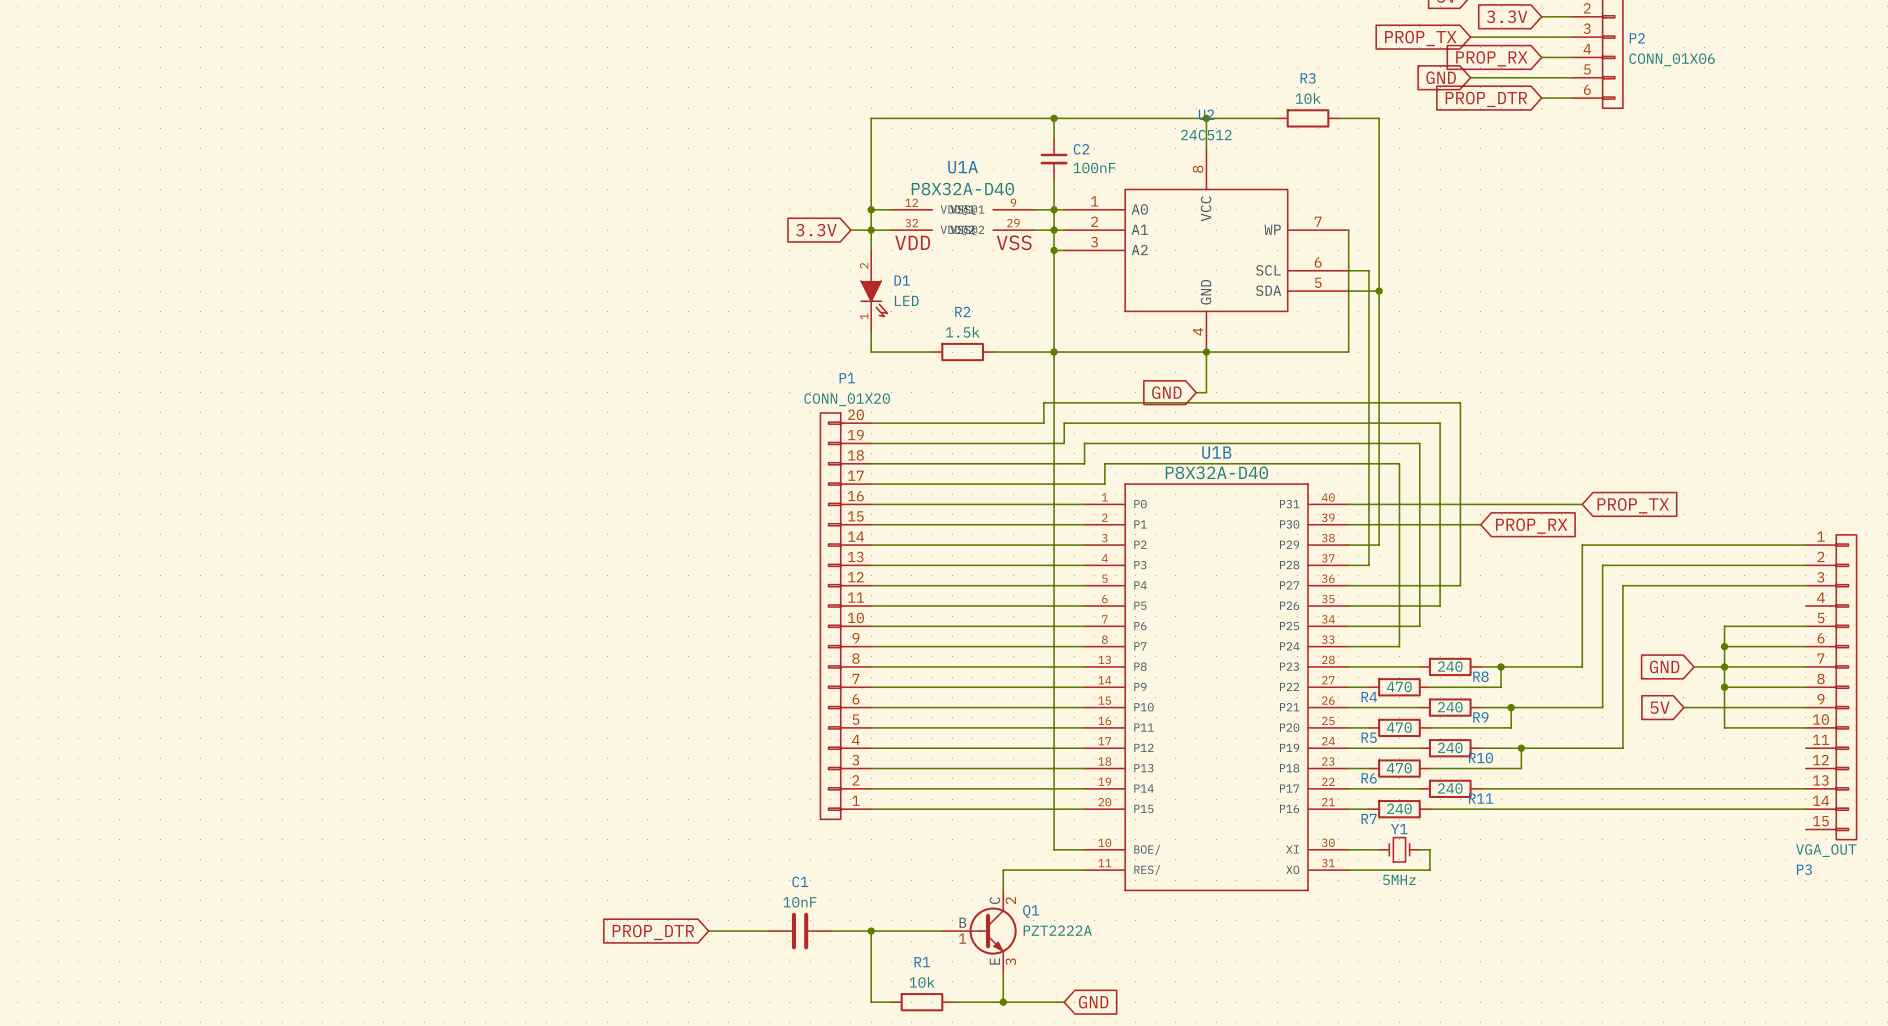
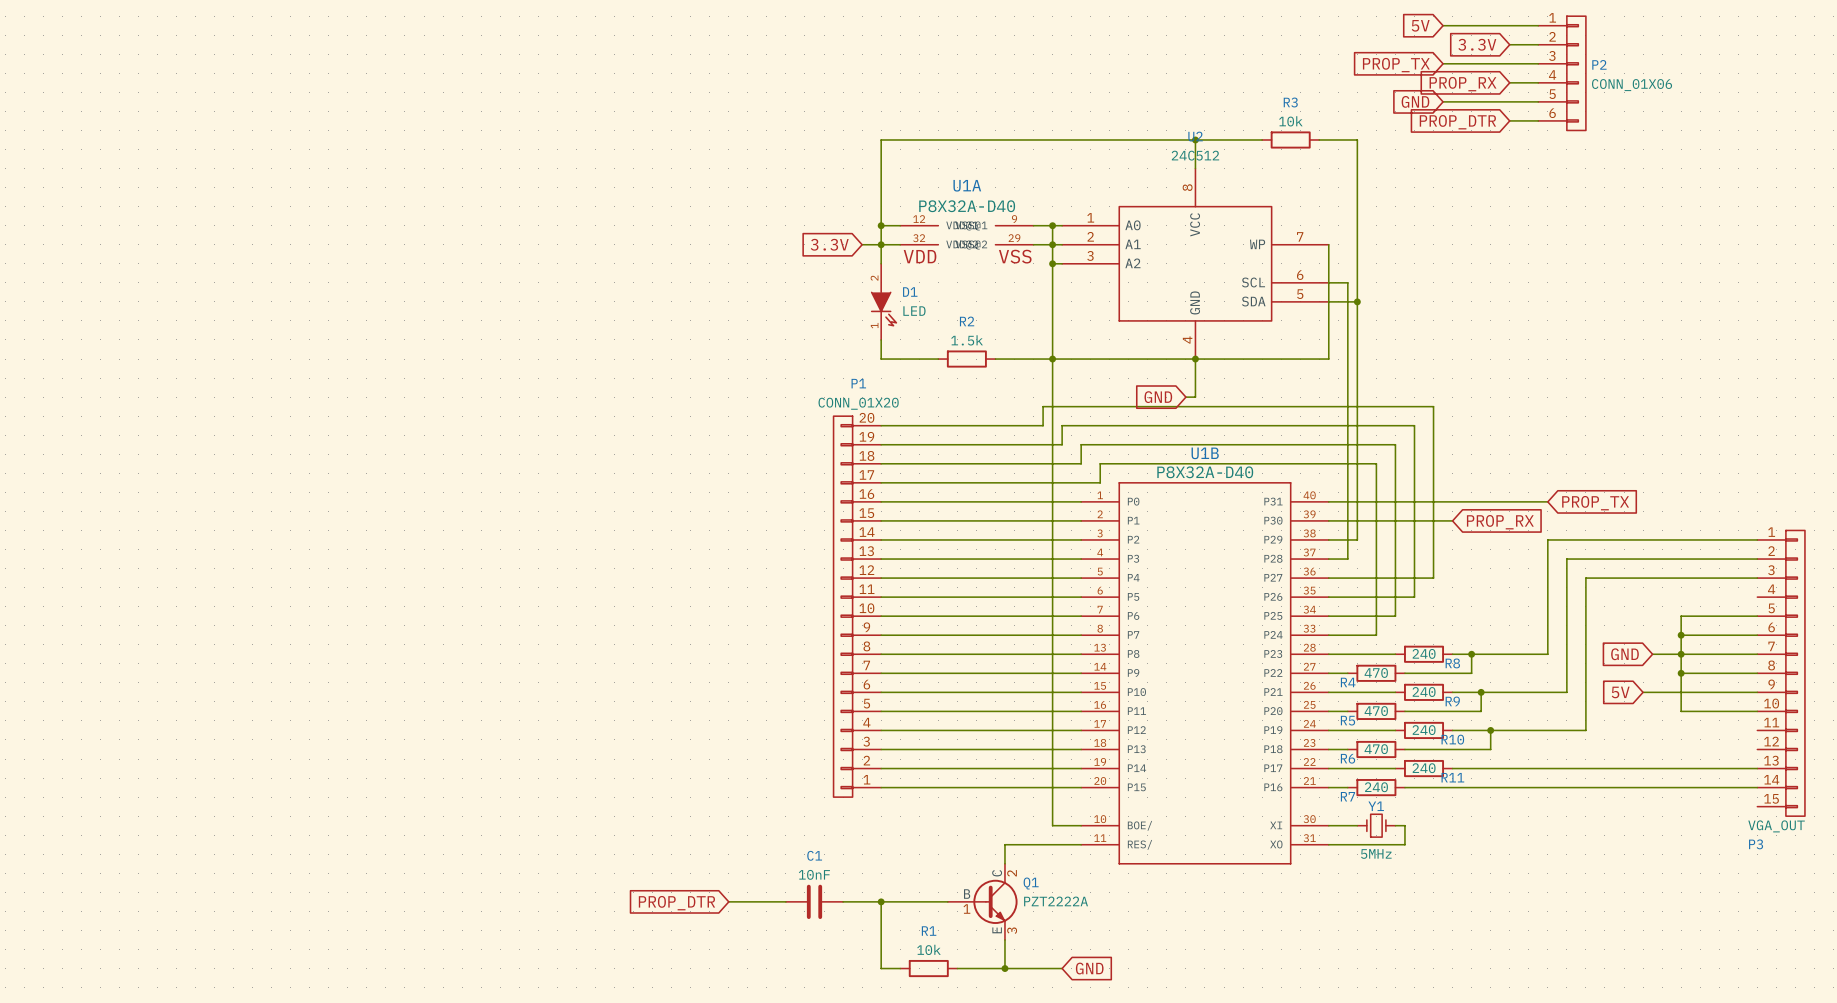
wire: (1054, 118) (1054, 138) -> none
junction: (1054, 118) -> none
C2: 100nF (1054, 159) -> none
wire: (1054, 179) (1054, 209) -> none

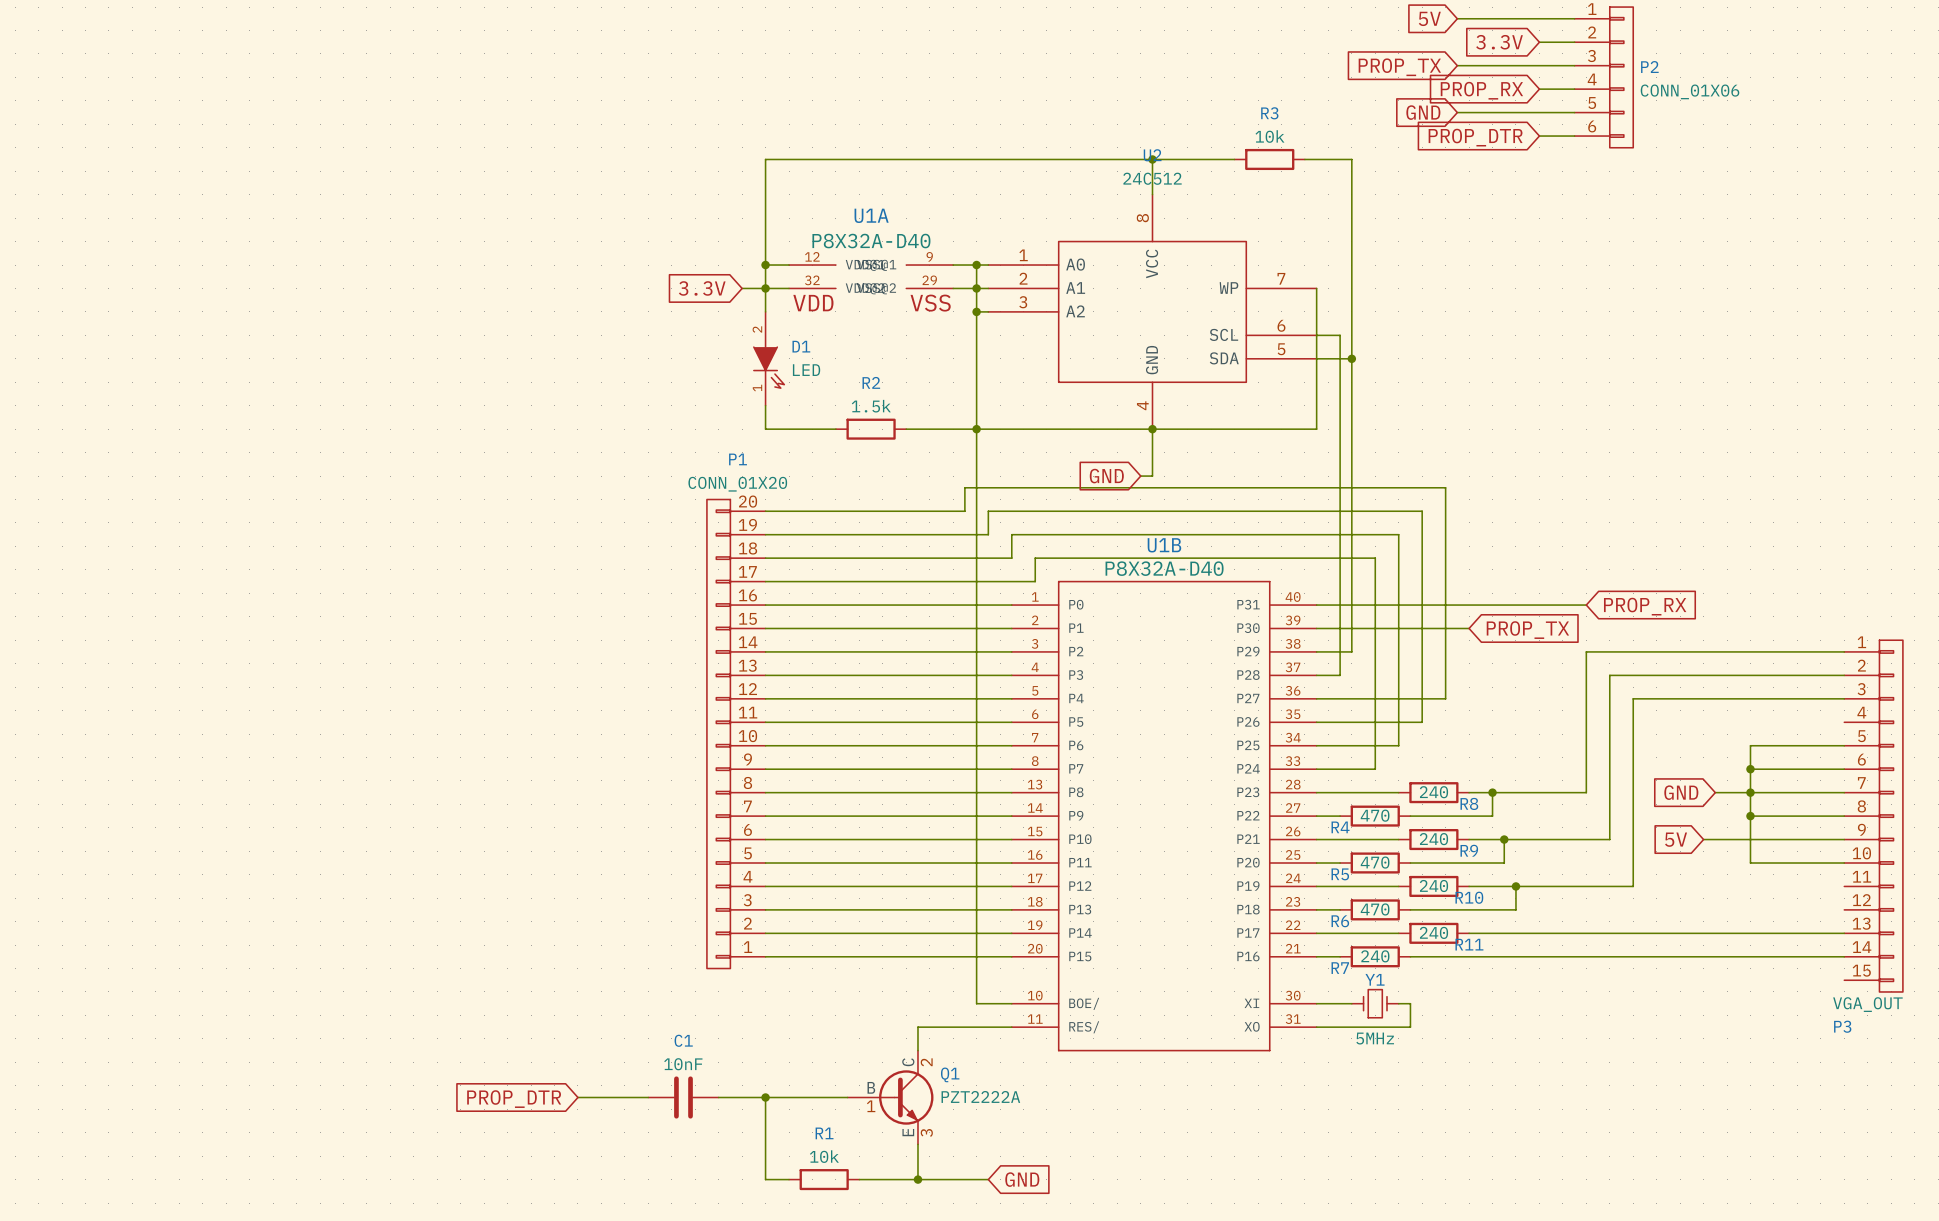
global label: PROP_TX (1595, 503) -> PROP_RX (1645, 606)
global label: PROP_RX (1500, 522) -> PROP_TX (1527, 630)

